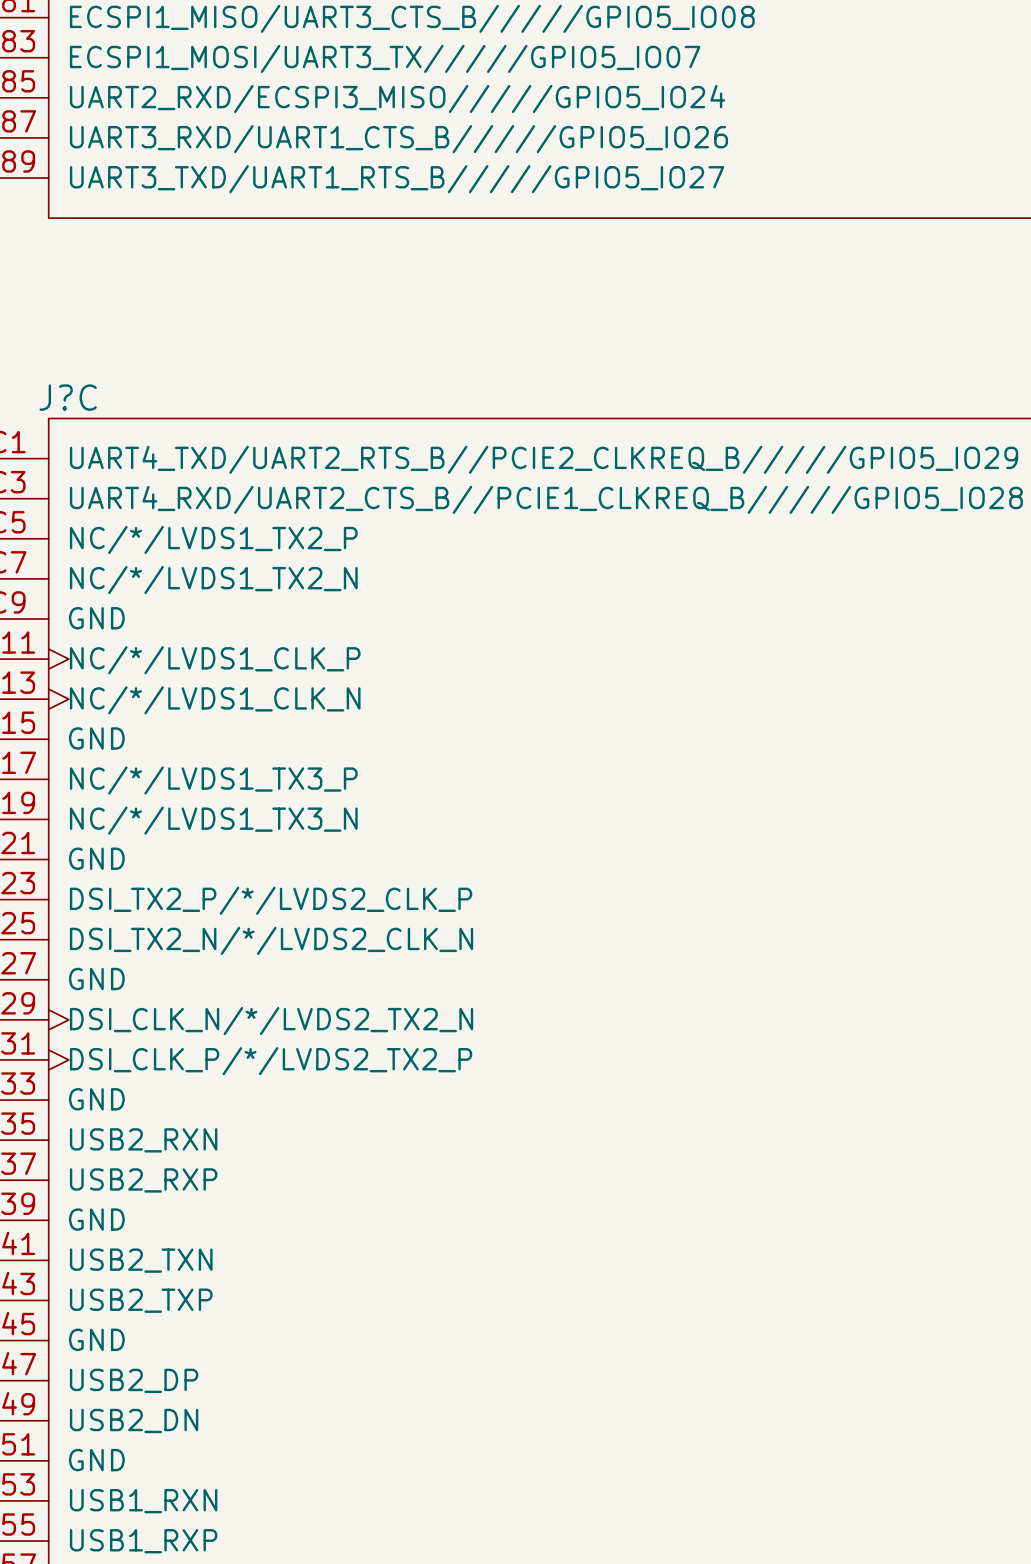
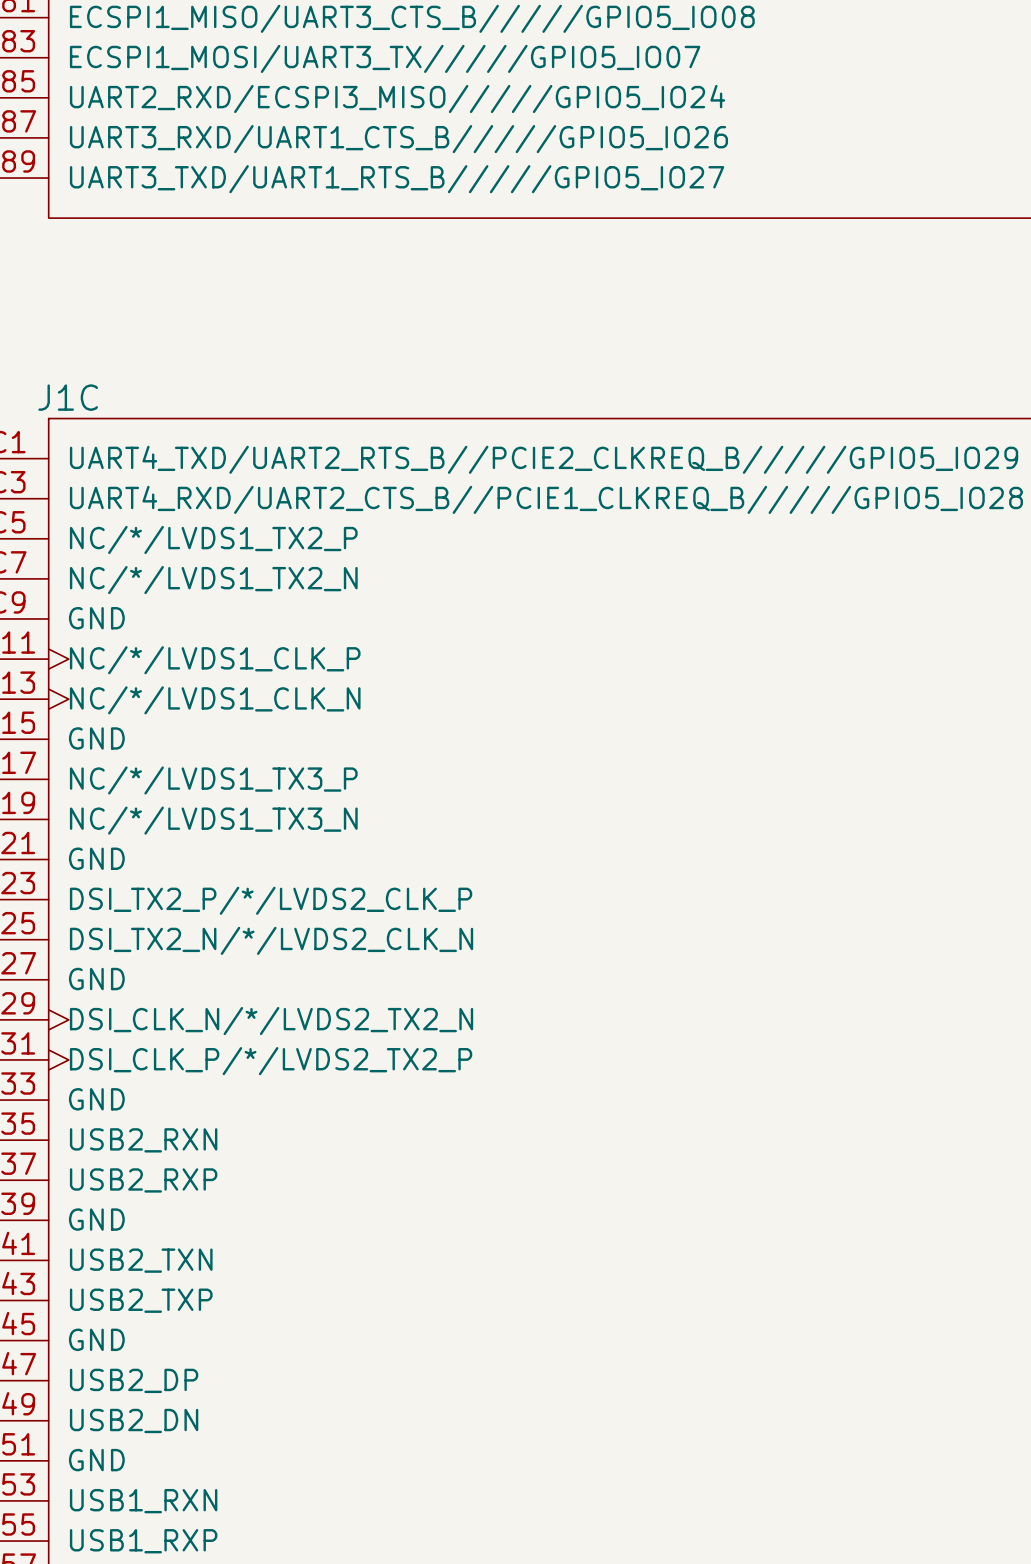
J?C name: J?C (68, 397) -> J1C (68, 397)

